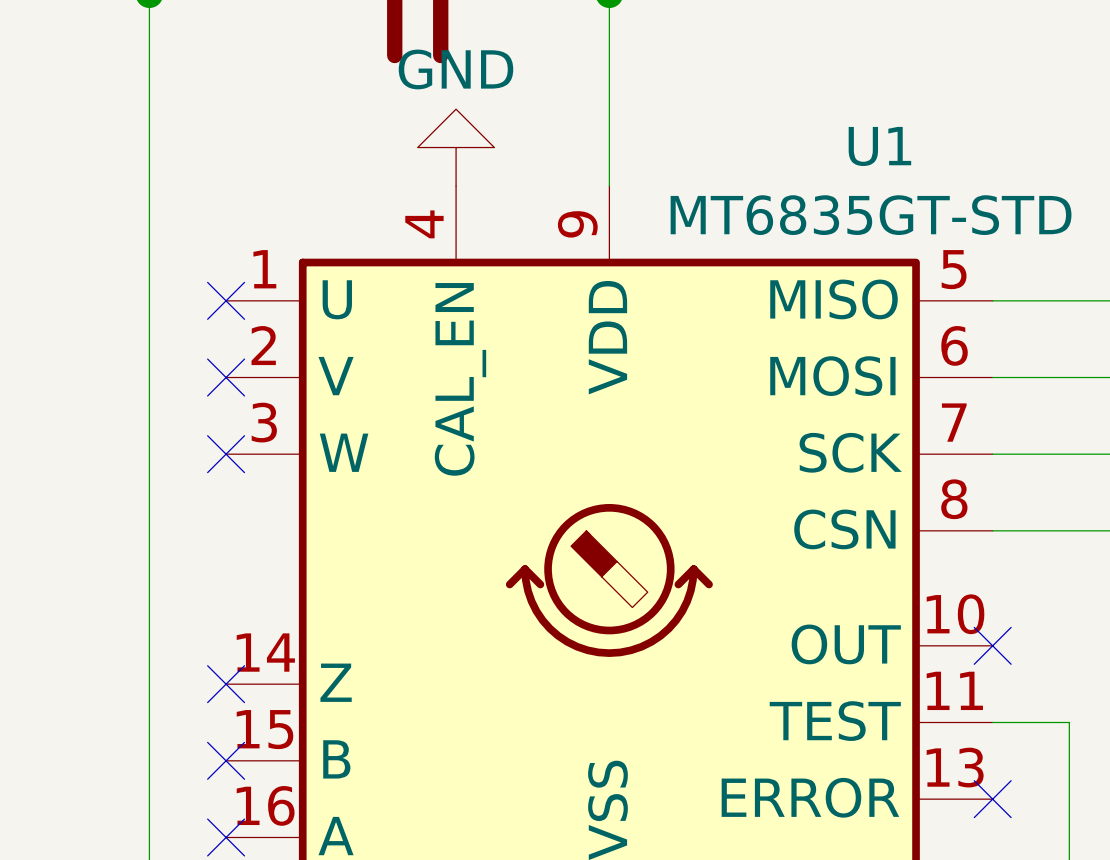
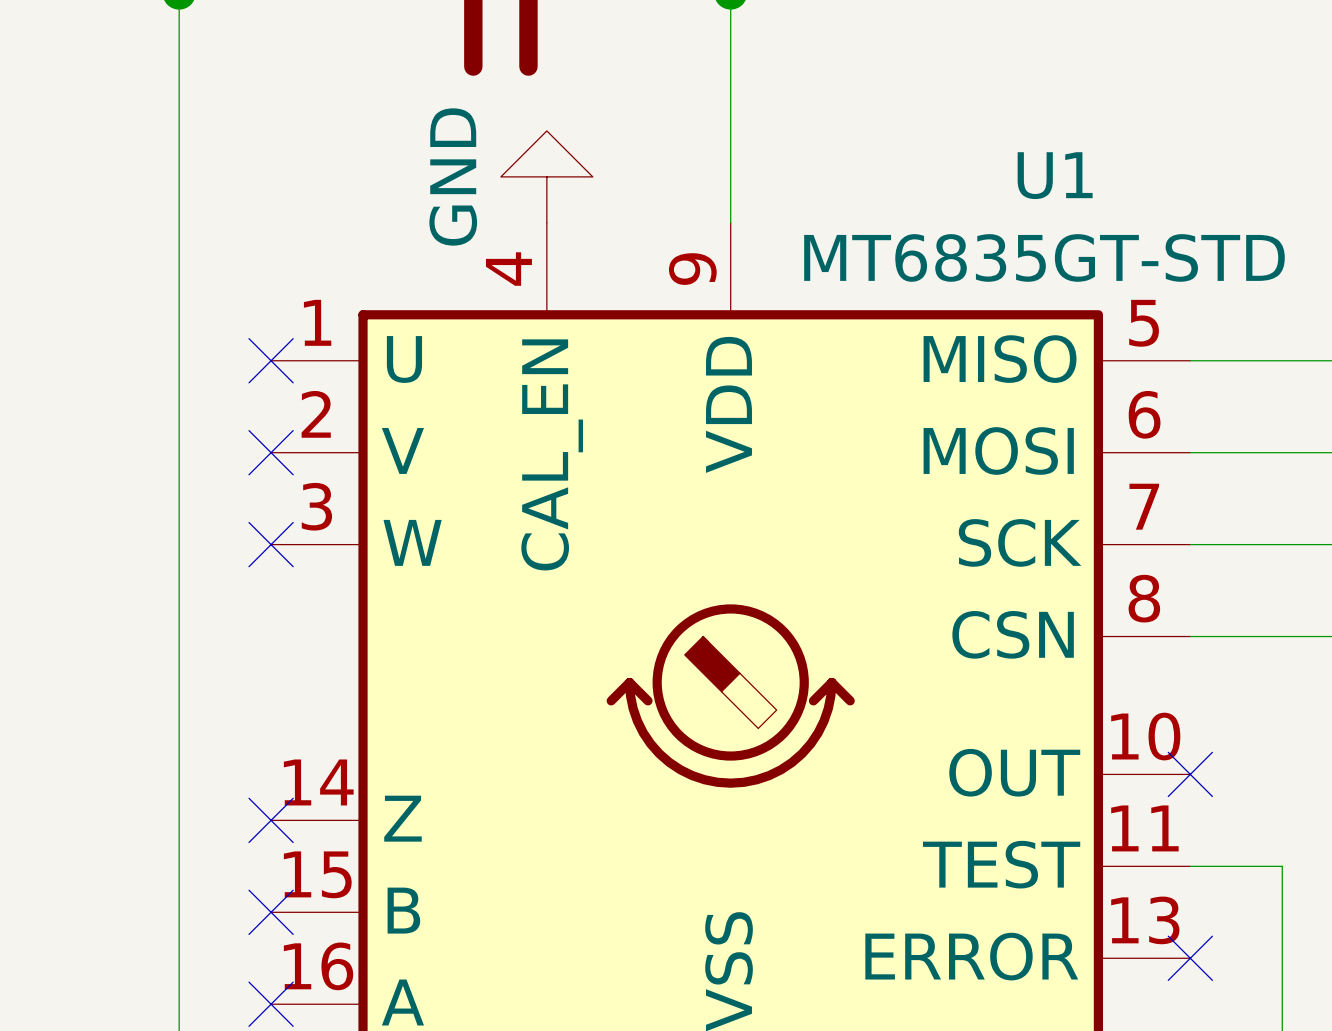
power symbol text rotation: 0° (455, 69) -> 90° counterclockwise (453, 177)

